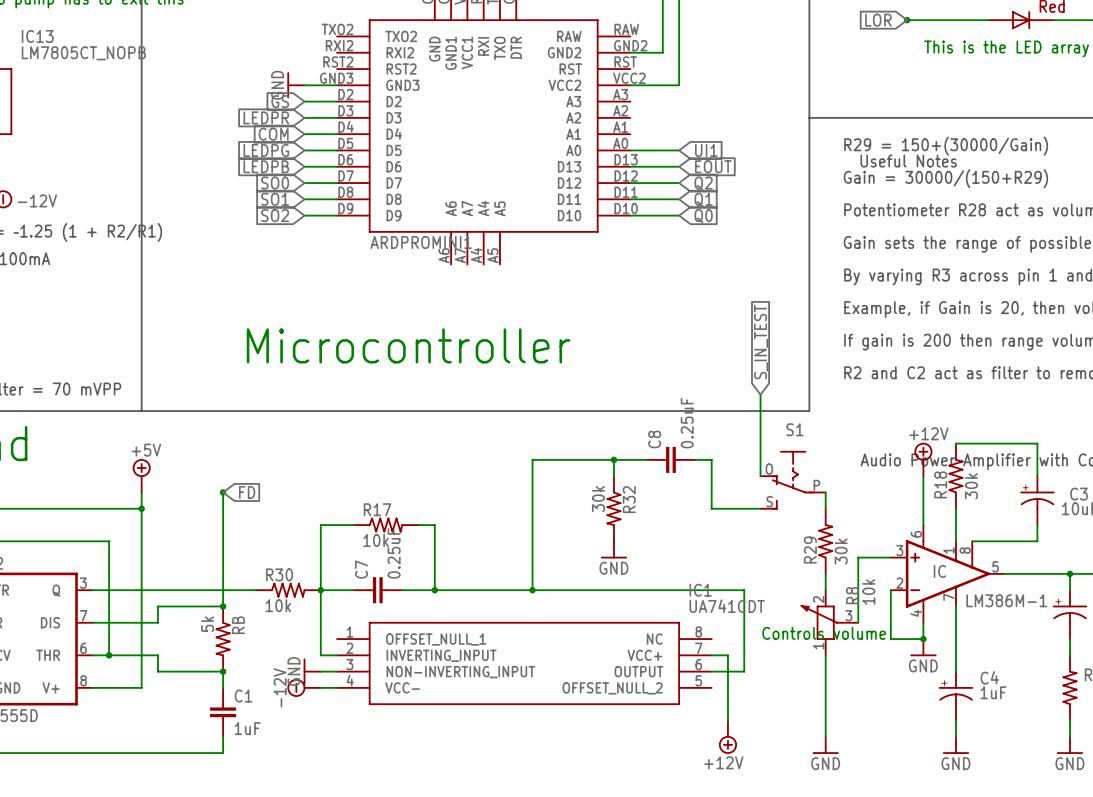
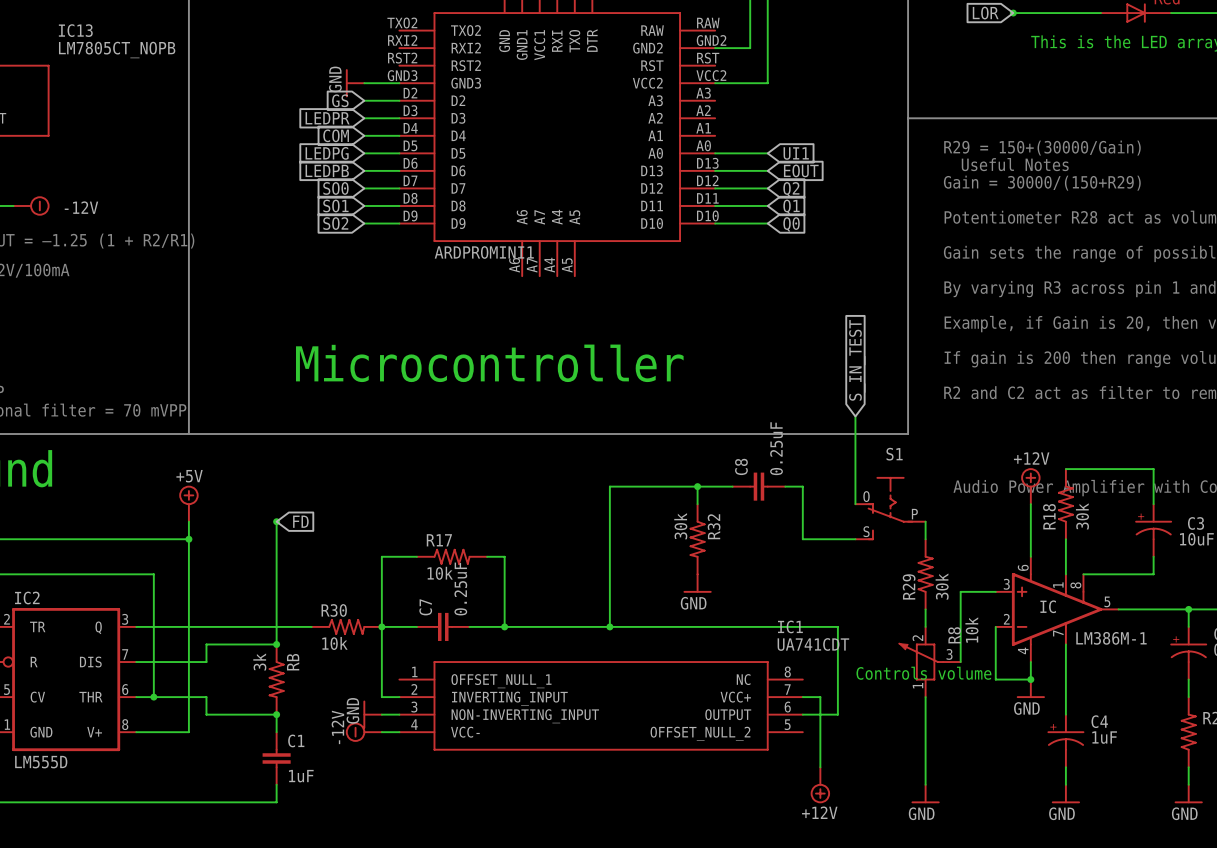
RB value: 5k (207, 624) -> 3k (259, 661)

